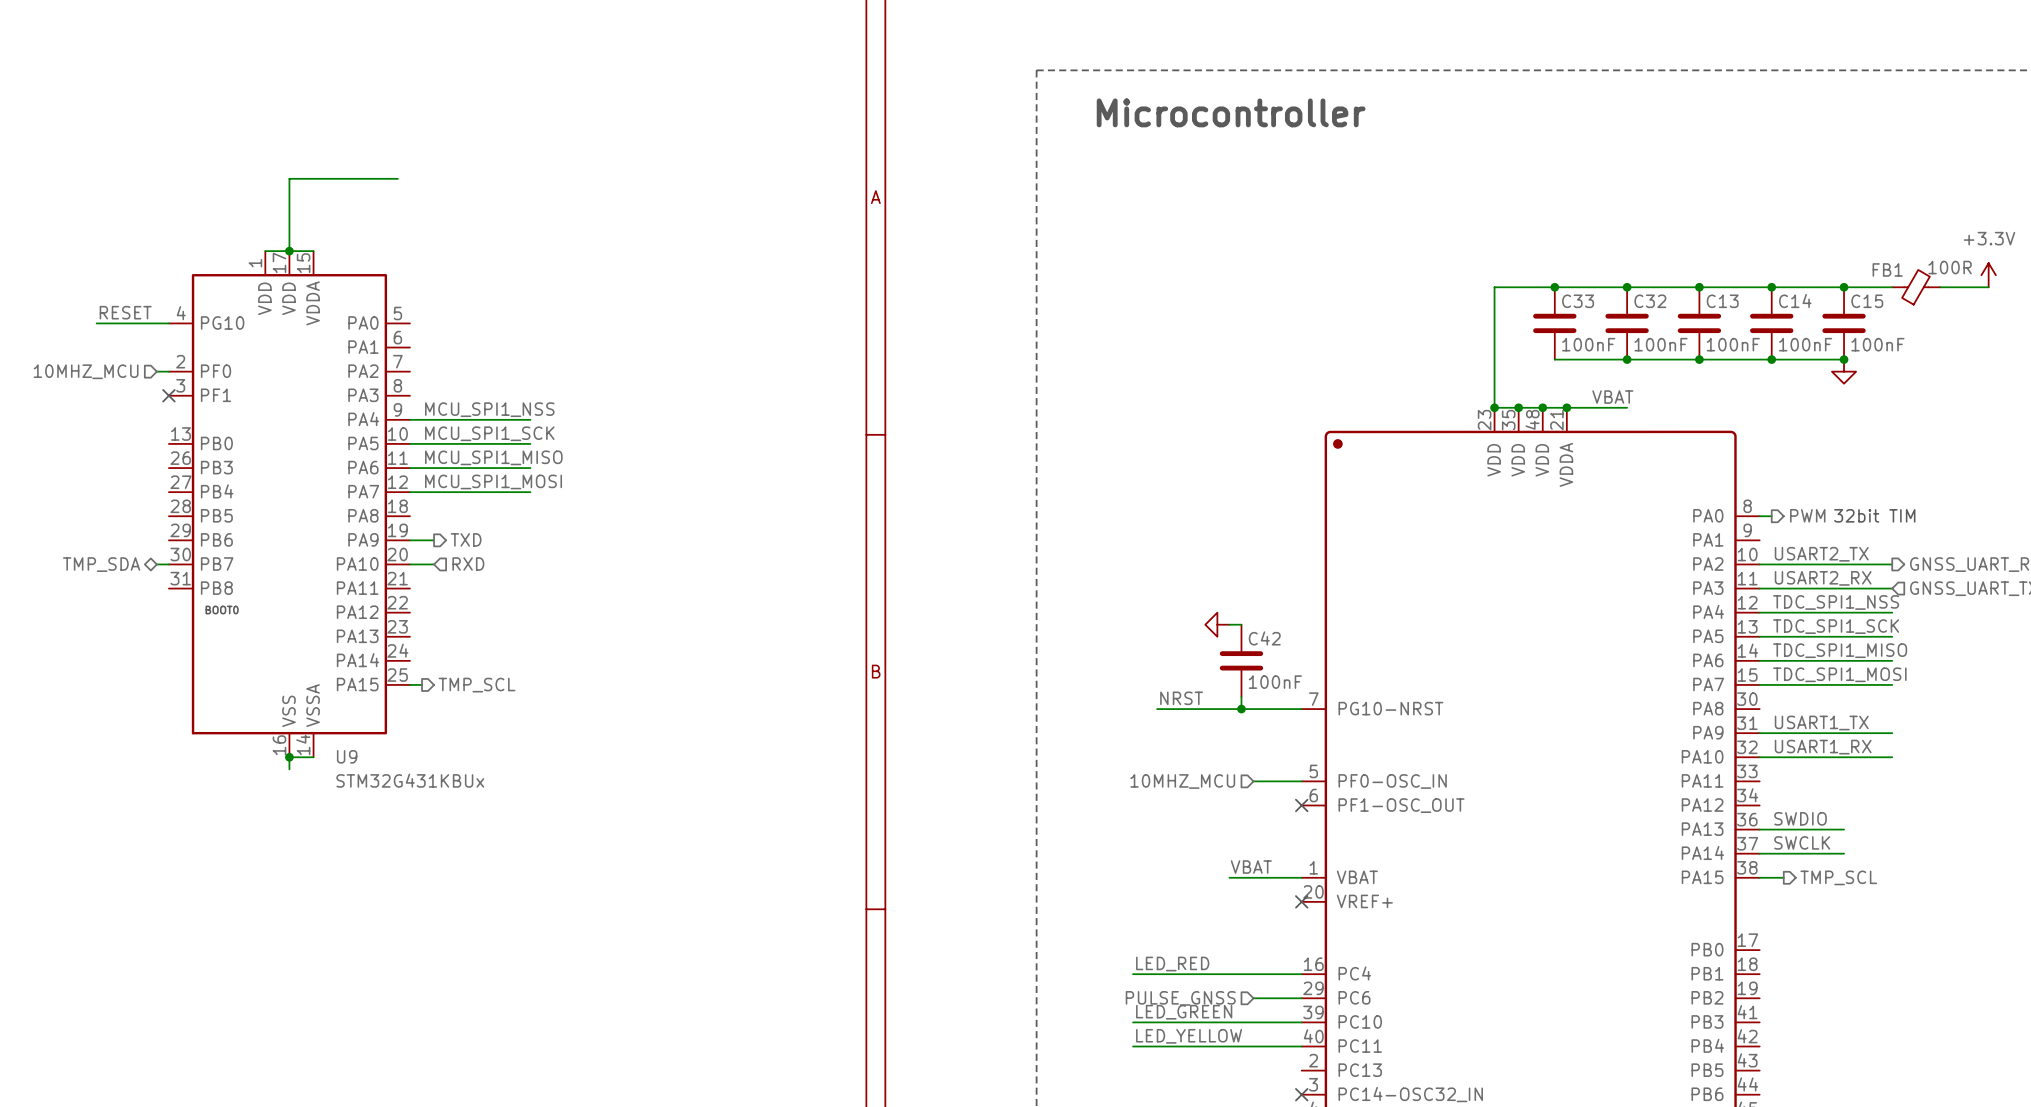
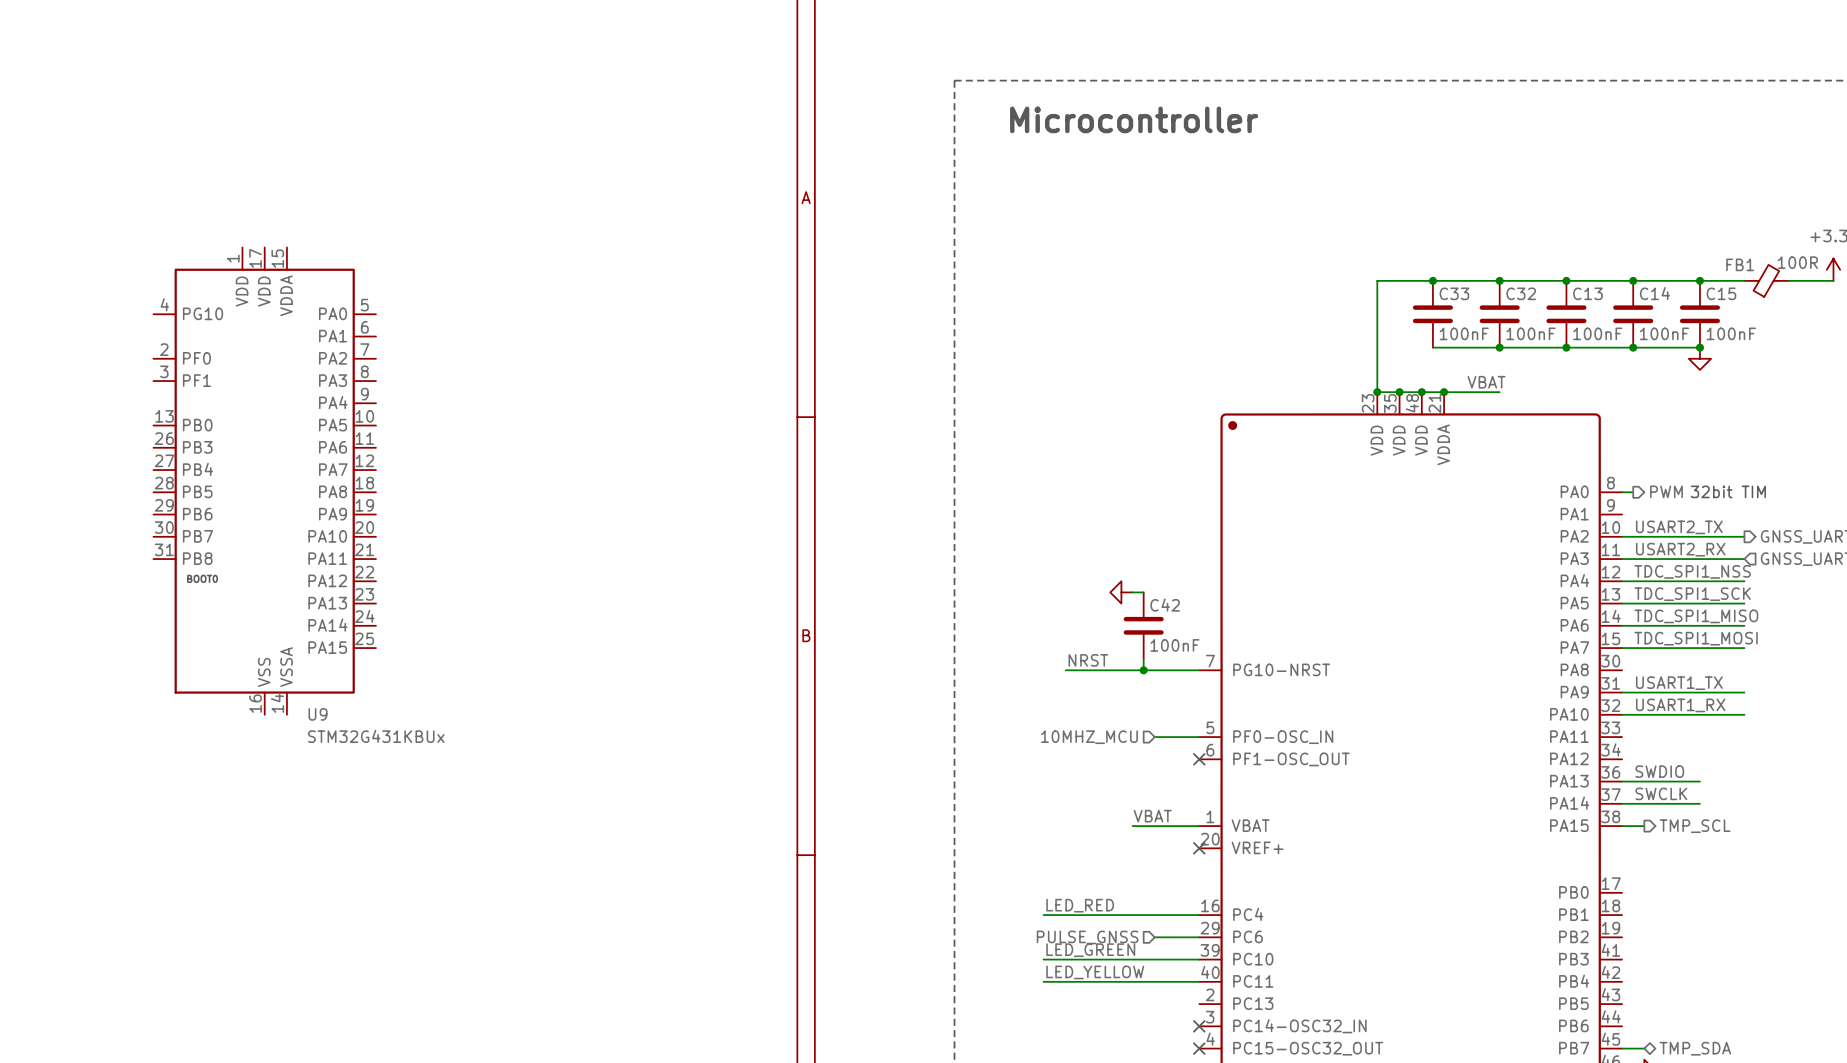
wire: (397, 178) (289, 178) (289, 251) -> none
wire: (265, 251) (313, 251) -> none
junction: (289, 251) -> none
label: RESET (125, 312) -> none
wire: (96, 323) (168, 323) -> none
hierarchical label: 10MHZ_MCU (86, 371) -> none
wire: (156, 371) (168, 371) -> none
no-connect mark: (168, 395) -> none
label: MCU_SPI1_NSS (489, 409) -> none
wire: (409, 419) (530, 419) -> none
label: MCU_SPI1_SCK (489, 433) -> none
wire: (409, 443) (530, 443) -> none
label: MCU_SPI1_MISO (493, 457) -> none
wire: (409, 468) (530, 468) -> none
label: MCU_SPI1_MOSI (493, 481) -> none
wire: (409, 492) (530, 492) -> none
hierarchical label: TXD (466, 539) -> none
wire: (409, 540) (434, 540) -> none
hierarchical label: TMP_SDA (101, 564) -> none
wire: (156, 564) (168, 564) -> none
wire: (409, 564) (434, 564) -> none
hierarchical label: RXD (468, 564) -> none
wire: (409, 684) (421, 684) -> none
hierarchical label: TMP_SCL (476, 685) -> none
junction: (289, 757) -> none
wire: (313, 757) (289, 757) (289, 769) -> none

